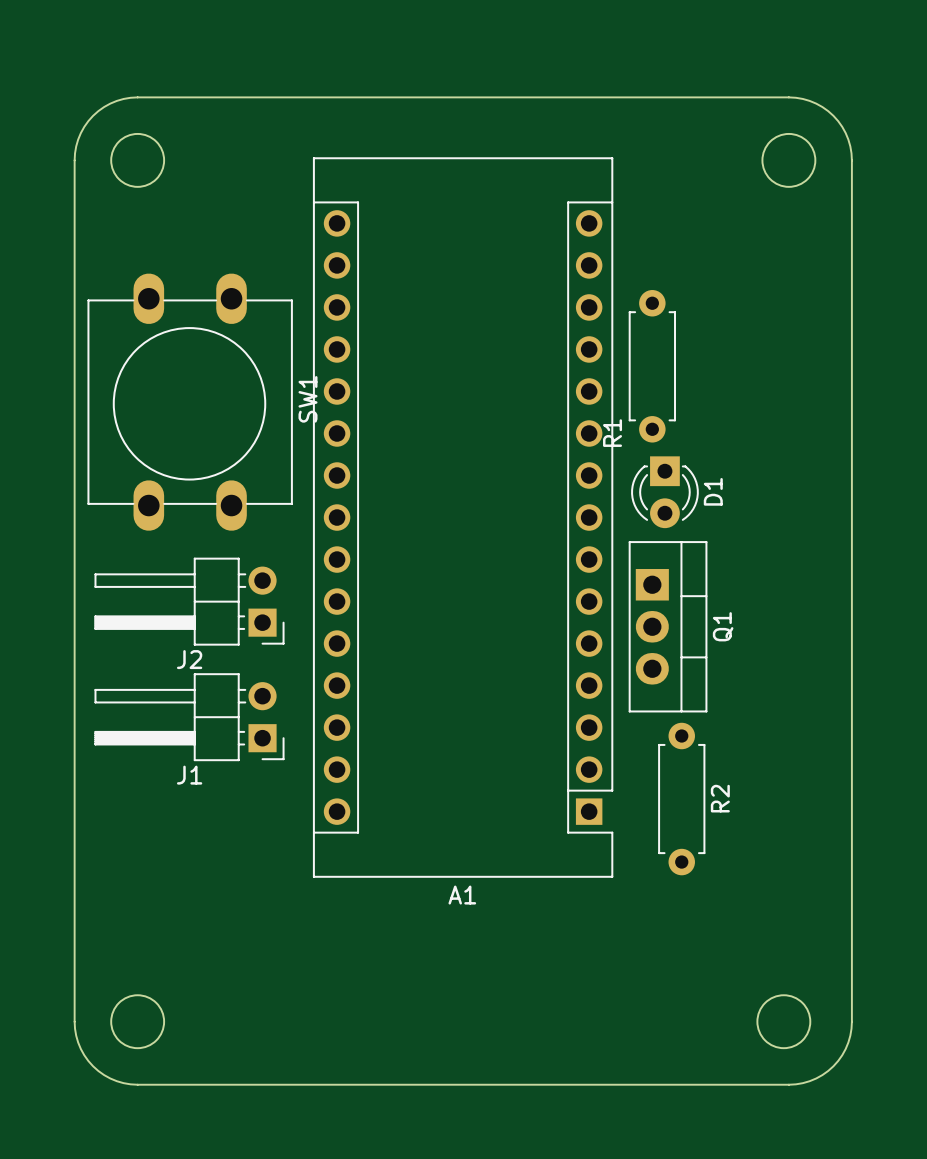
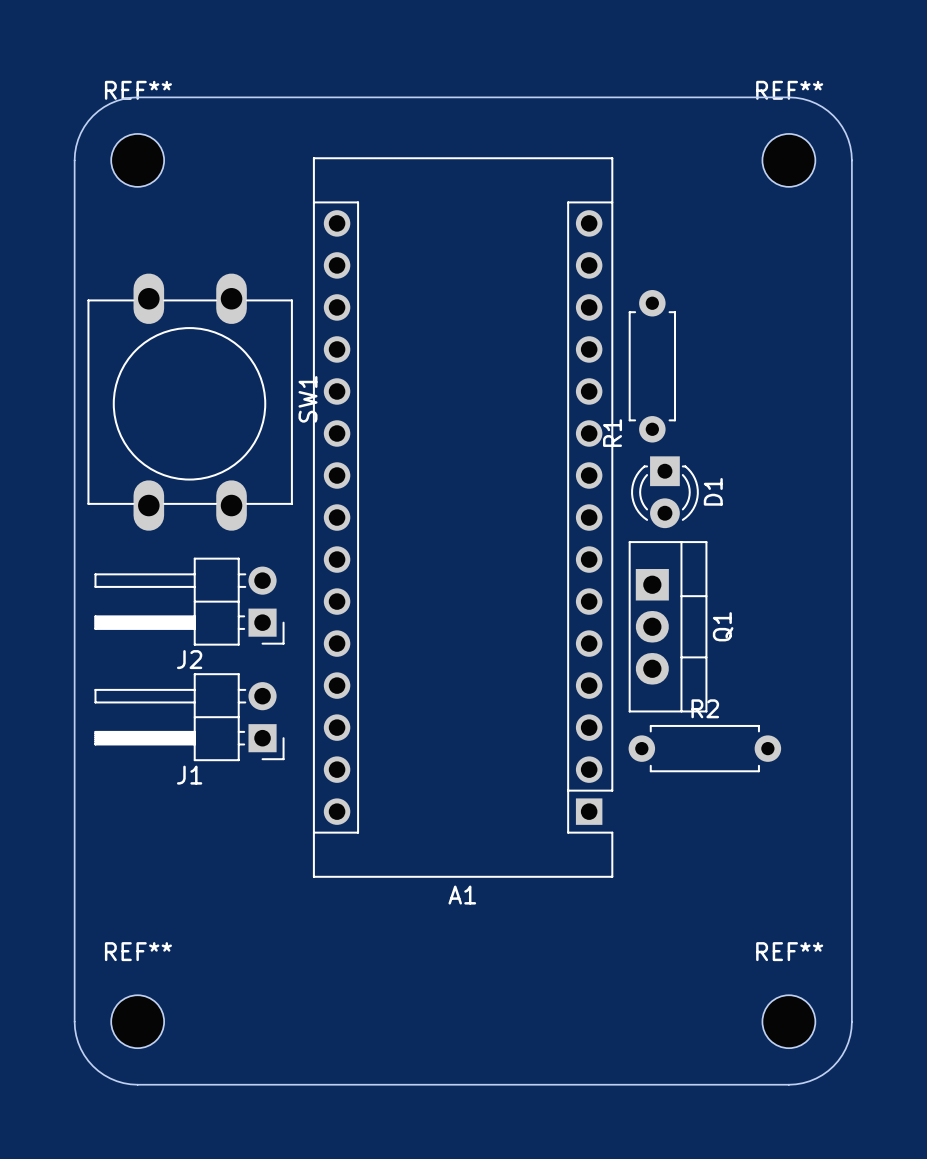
round board edge: [110, 133, 165, 188] -> none
round board edge: [761, 133, 817, 188] -> none
REF**: none -> (137, 160)
REF**: none -> (788, 160)
R2 name position: R2 (720, 798) -> R2 (705, 708)
R2 rotation: 0° (681, 799) -> 90° clockwise (704, 748)
round board edge: [110, 994, 165, 1050] -> none
round board edge: [756, 994, 812, 1050] -> none
REF**: none -> (137, 1021)
REF**: none -> (788, 1021)

